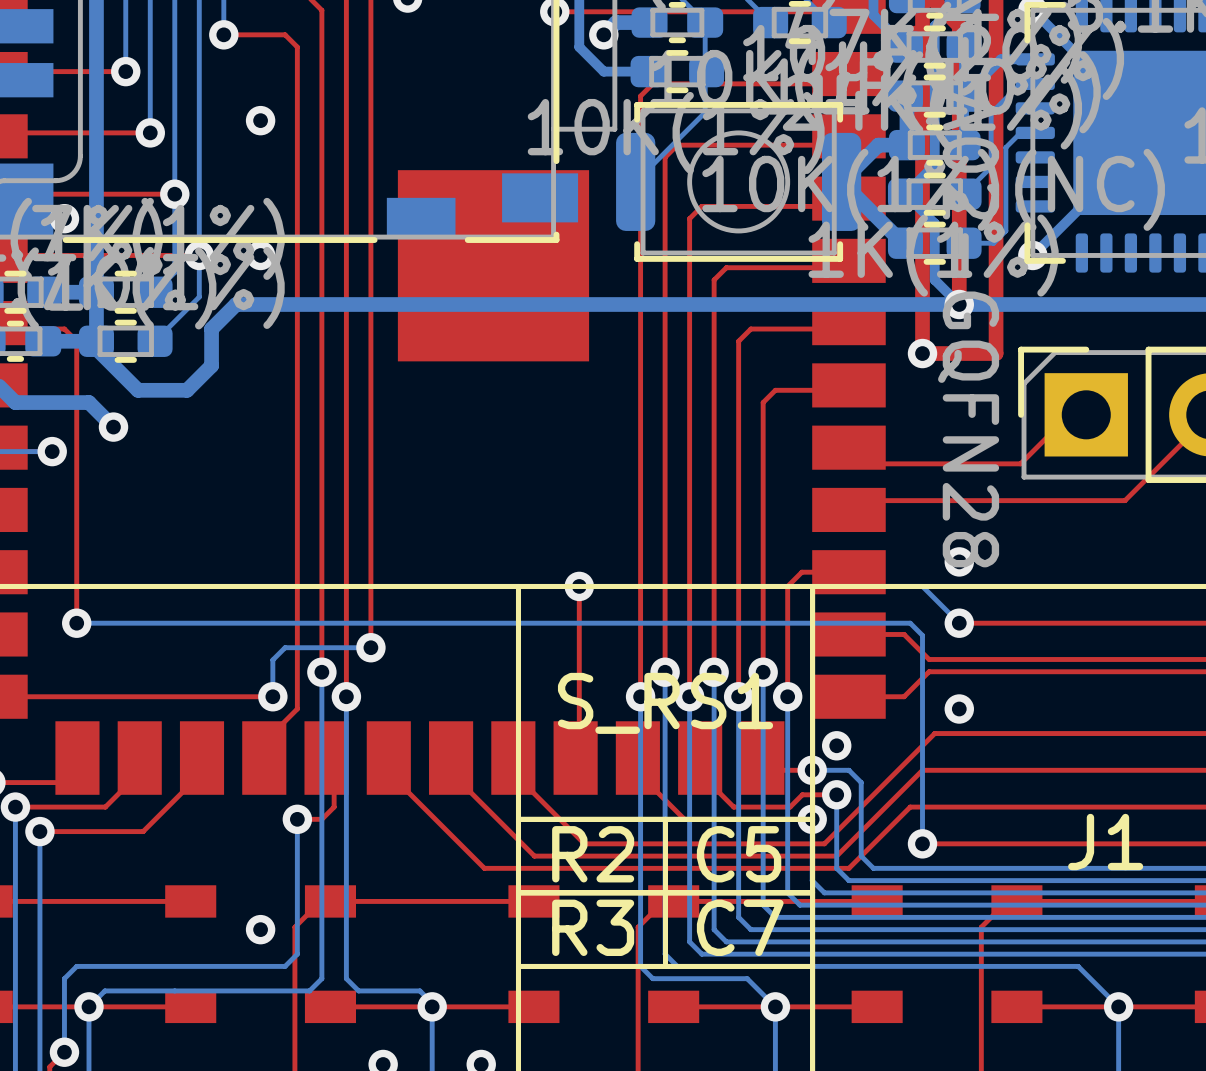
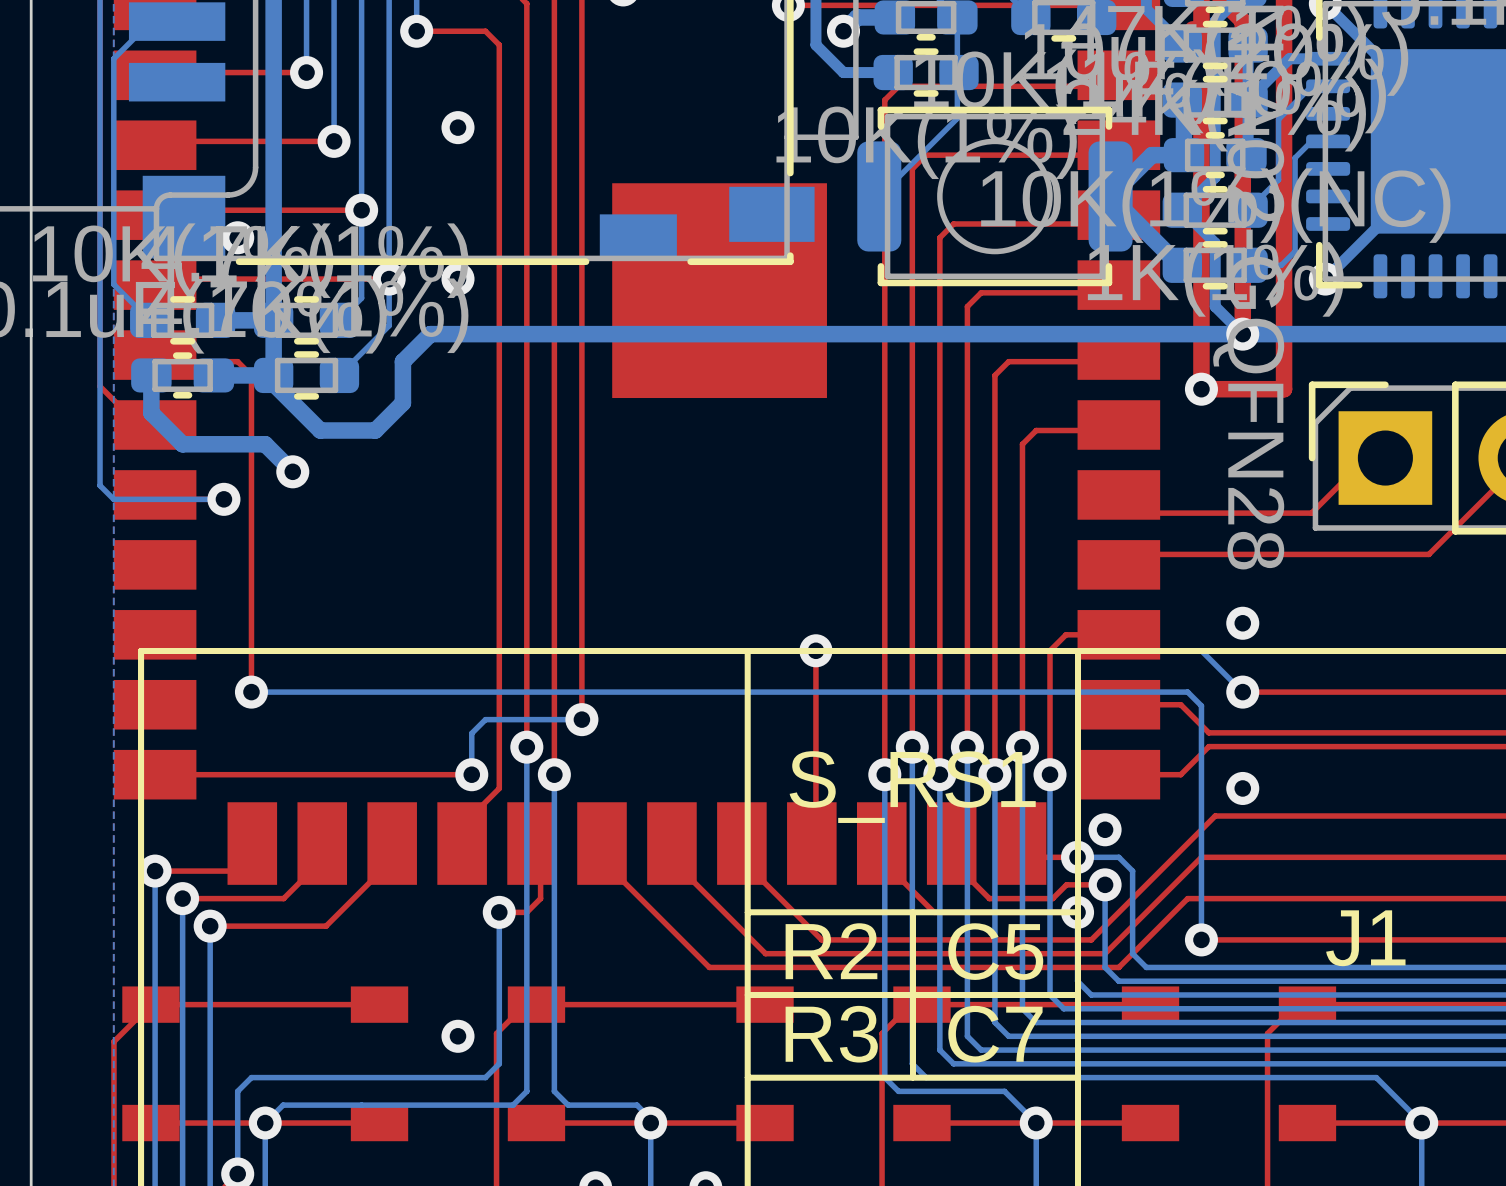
J1 name position: J1 (1105, 842) -> J1 (1365, 938)

